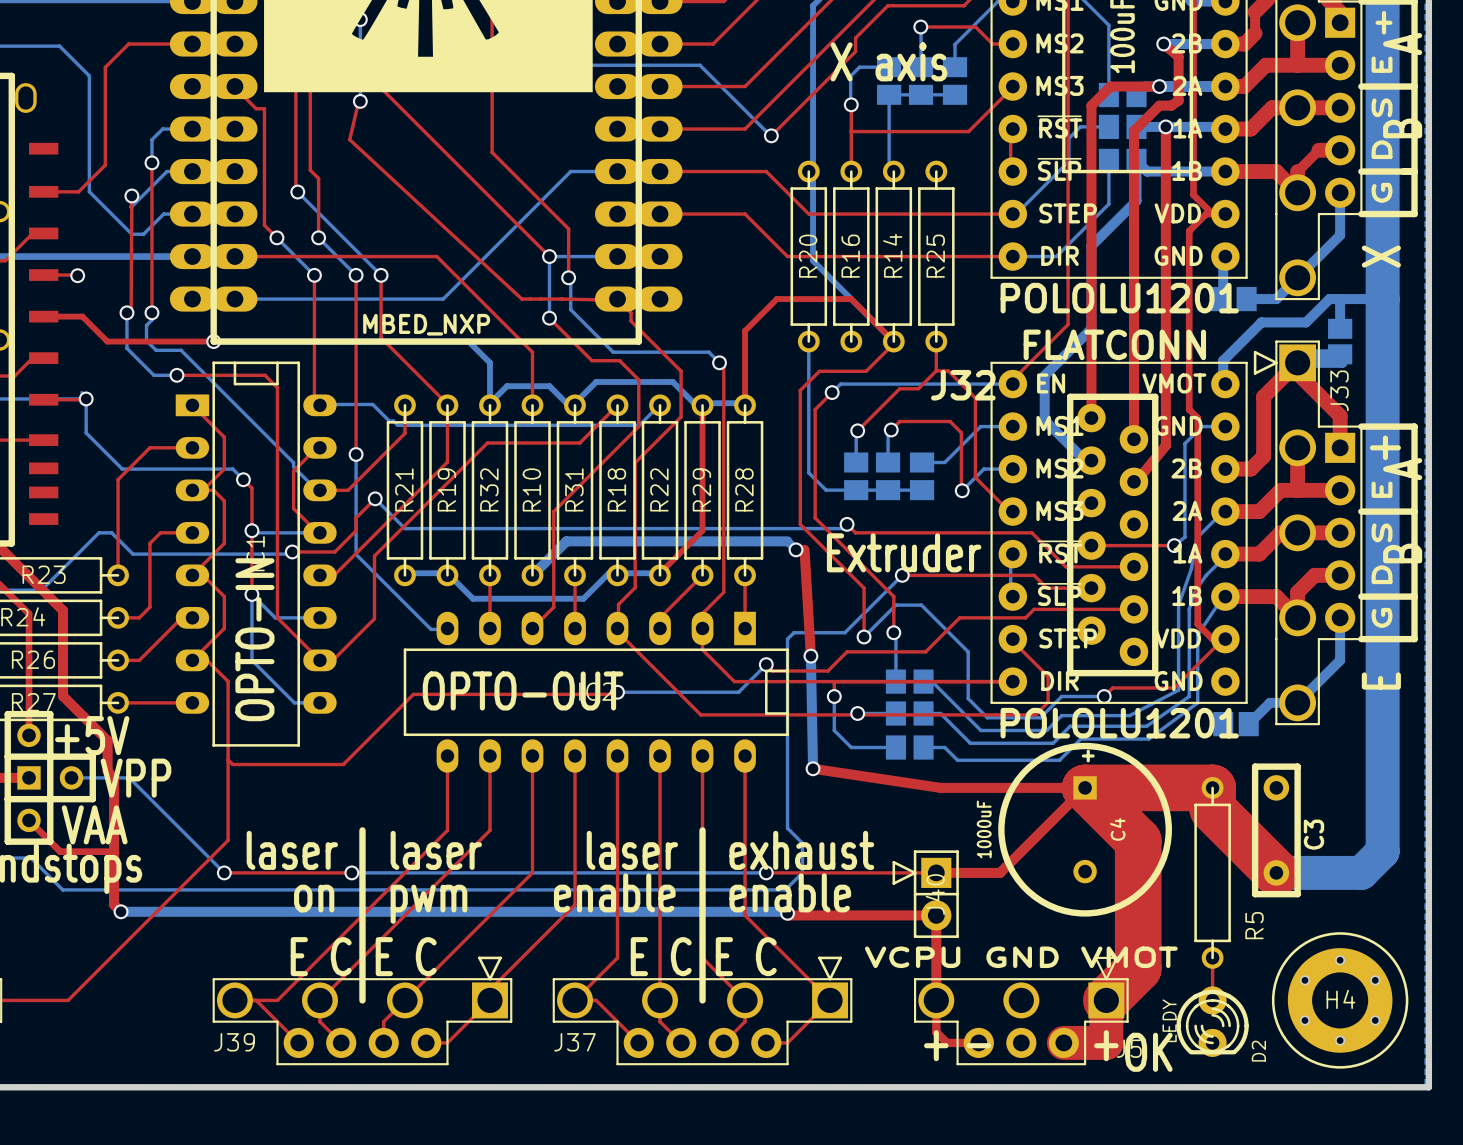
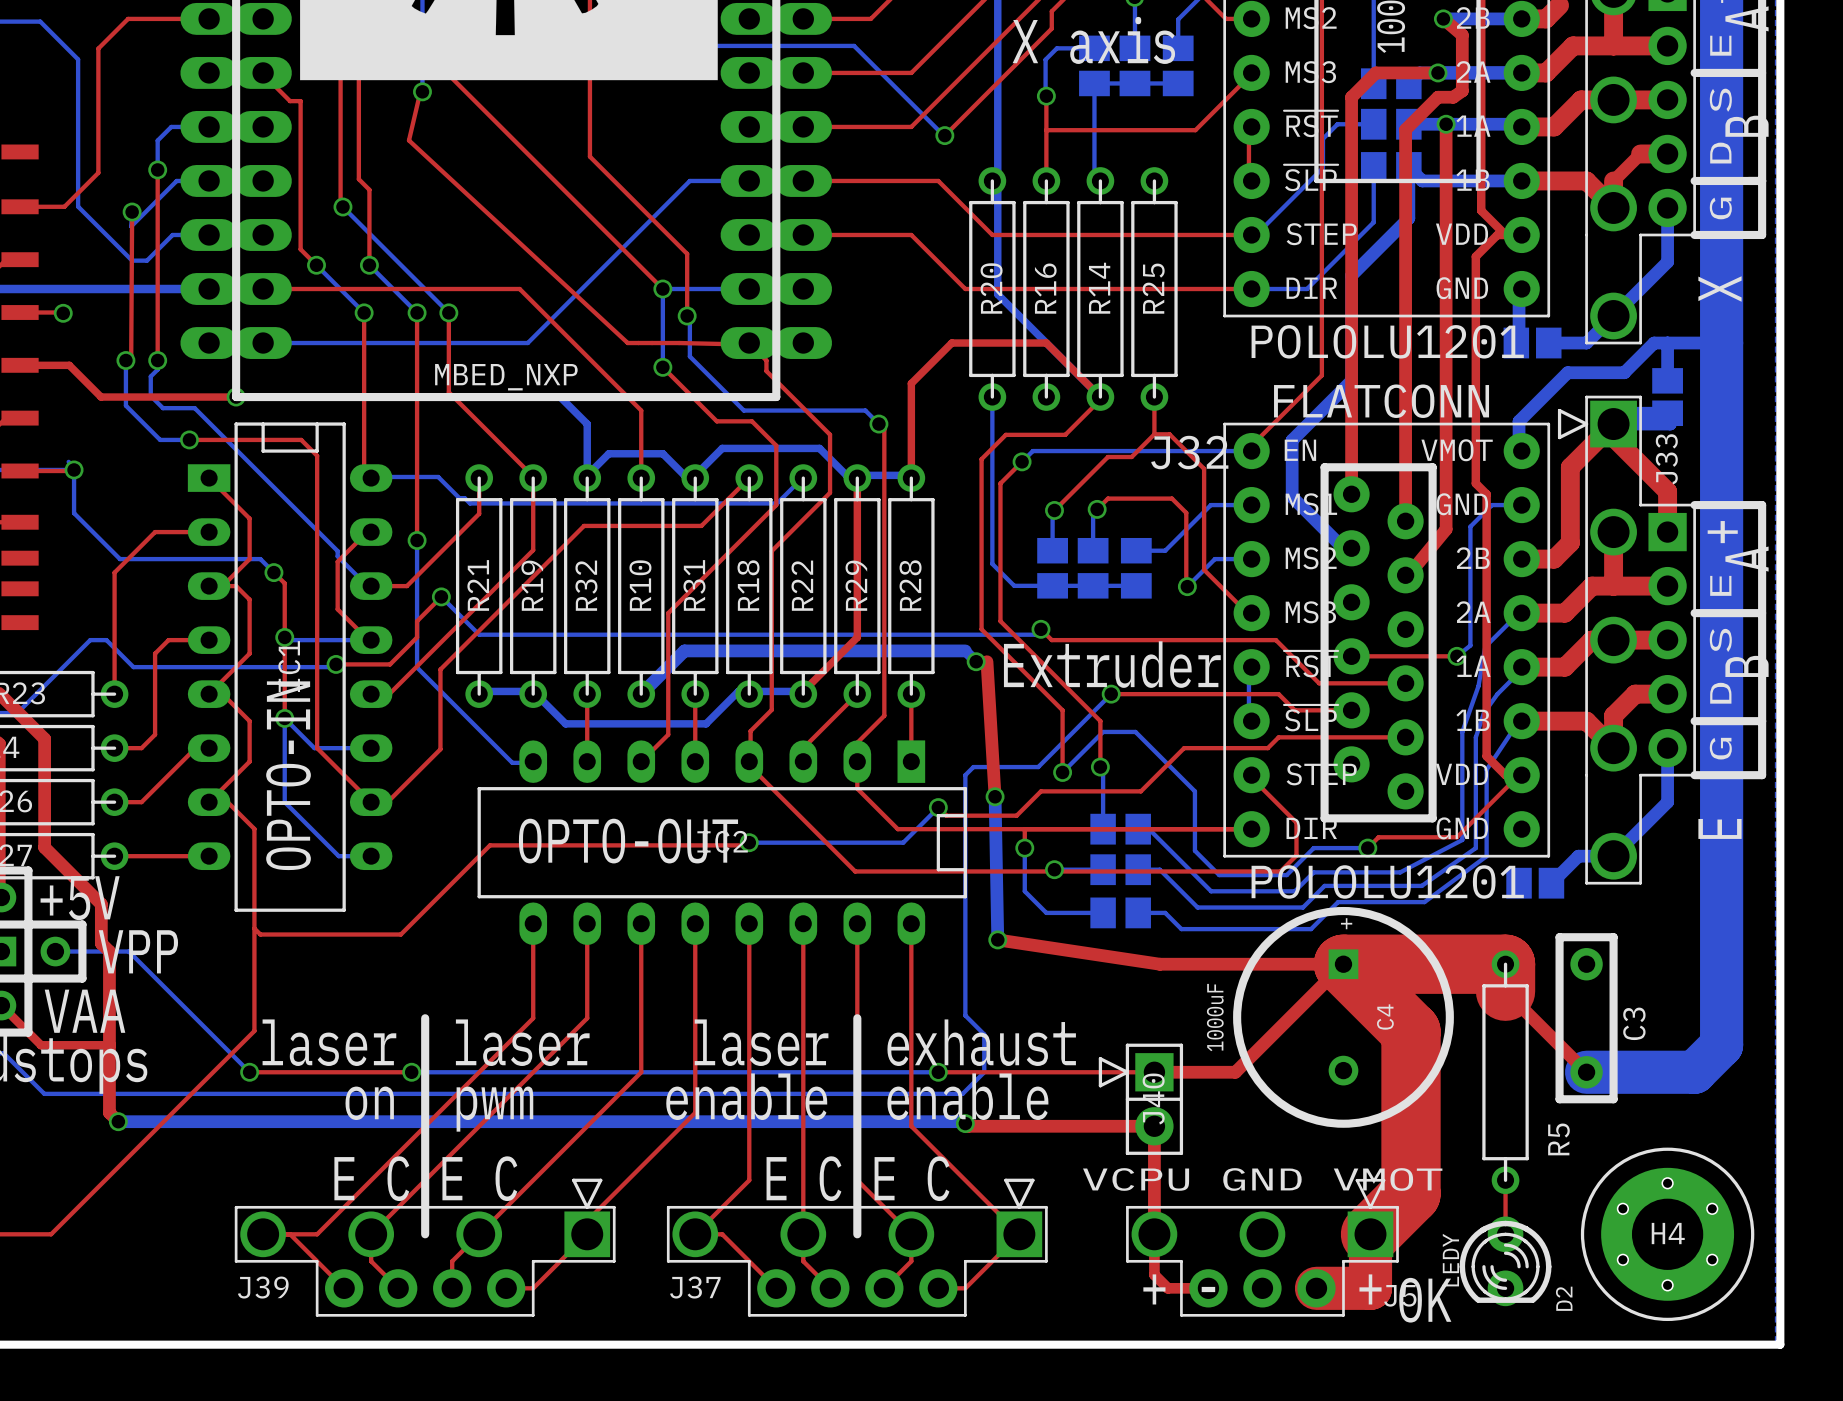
top track width: thick (1216, 813) (1276, 872) -> thin (1510, 996) (1586, 1072)

